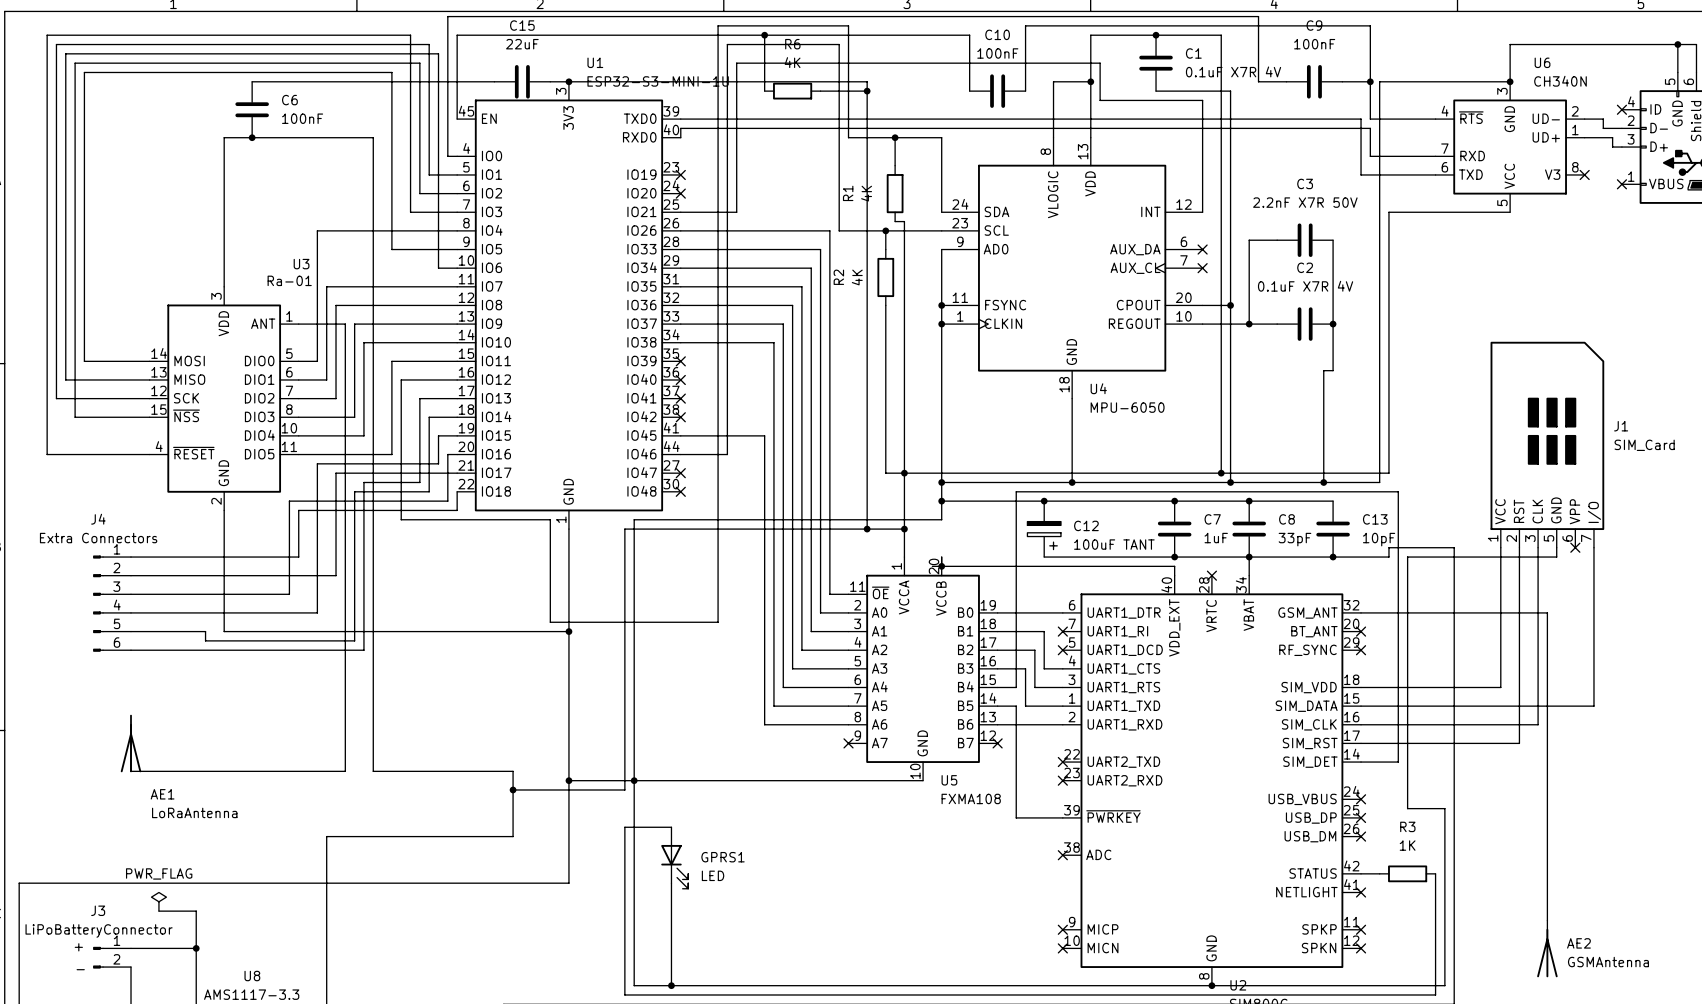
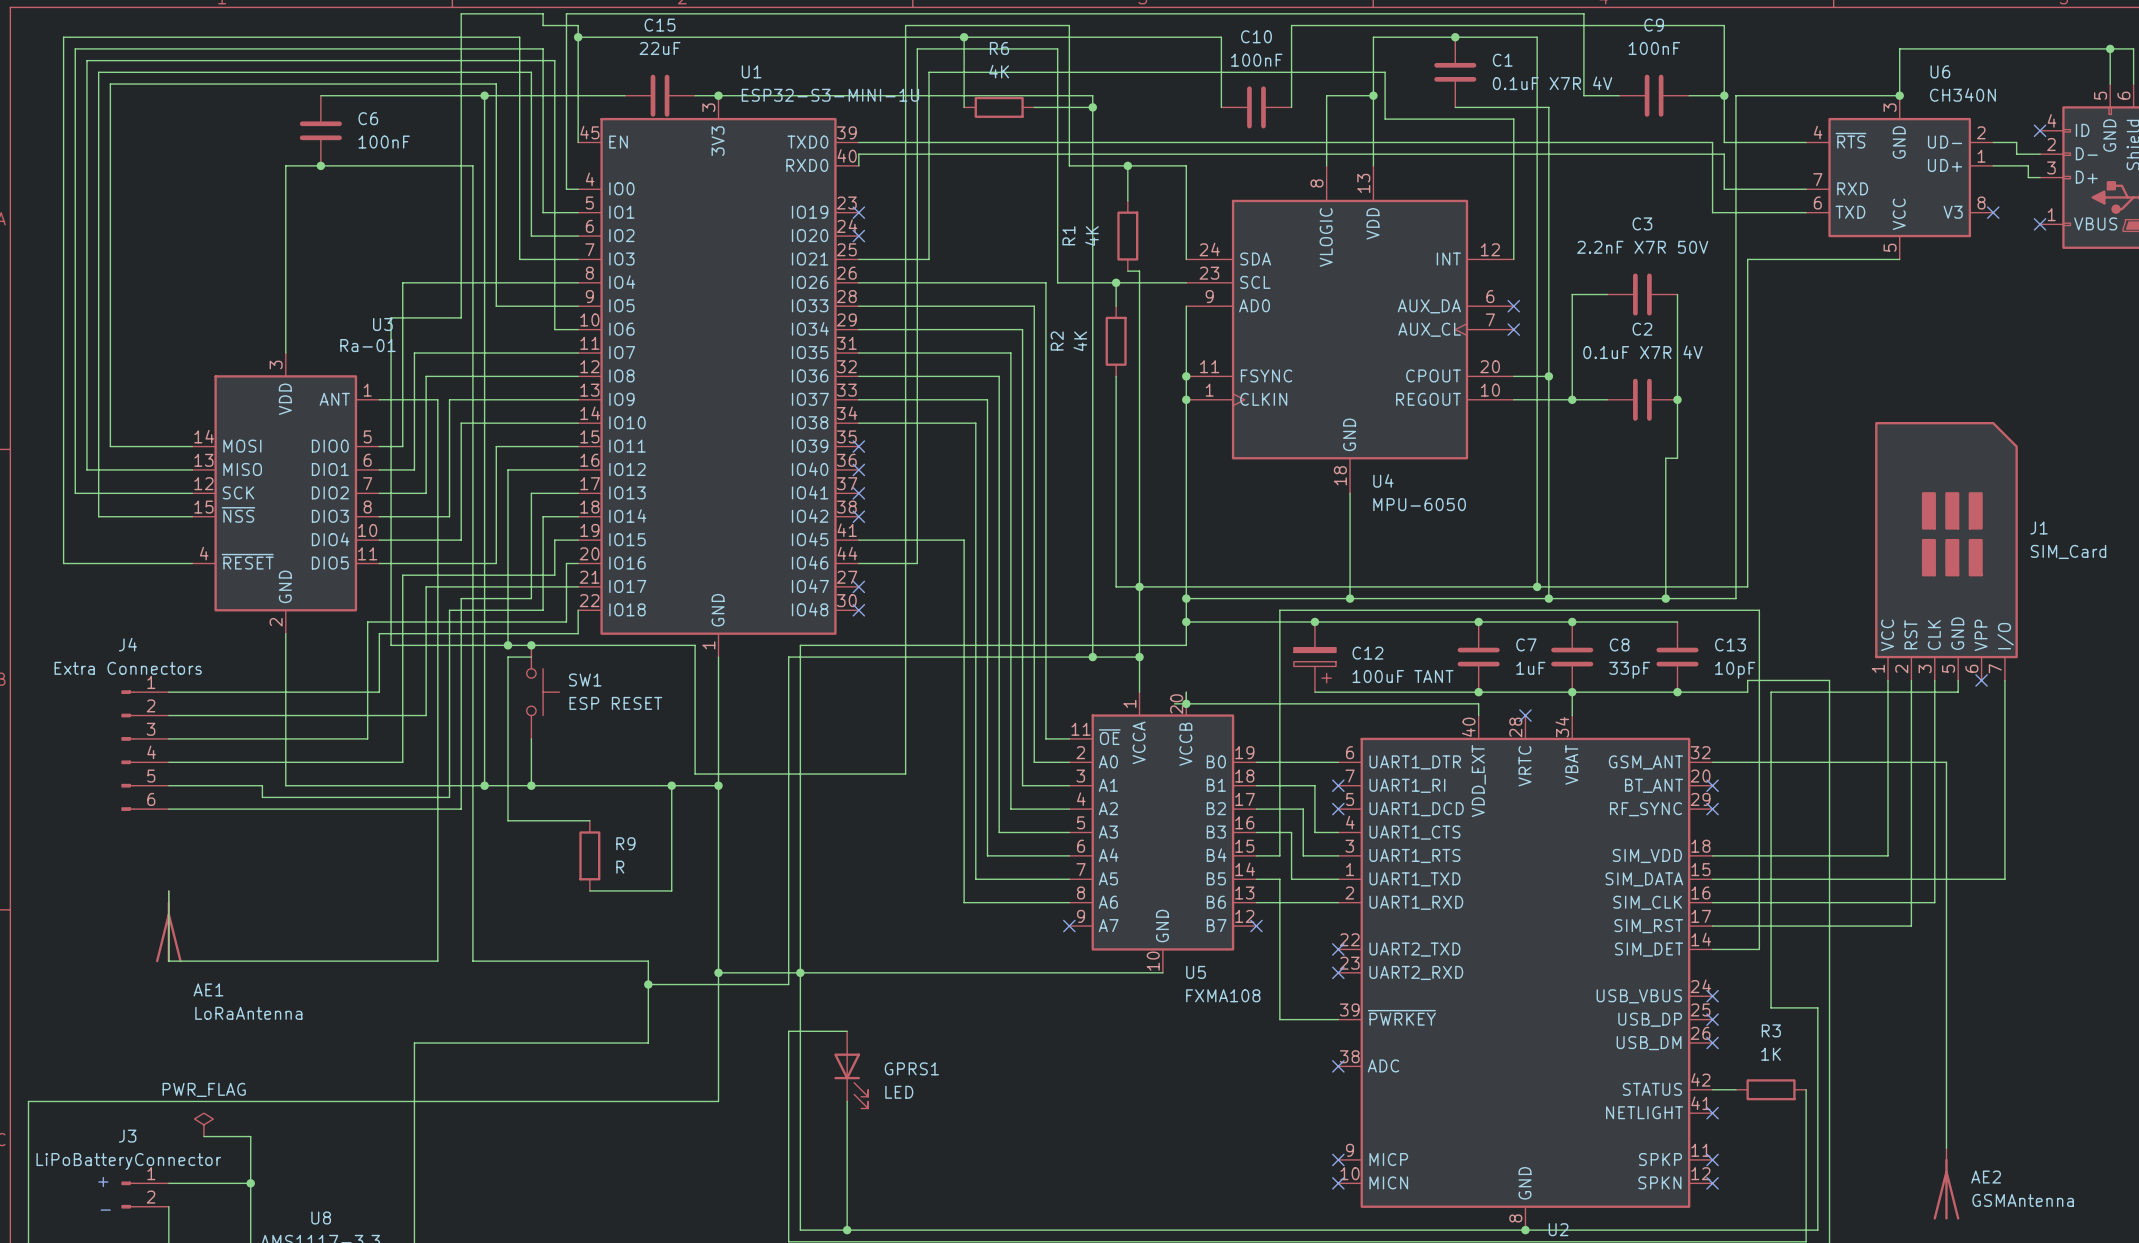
wire: none -> (578, 37) (578, 25) (543, 25) (543, 13) (461, 13) (461, 317) (391, 317) (391, 645) (507, 645)
junction: none -> (578, 37)
wire: none -> (484, 95) (484, 785)
junction: none -> (484, 95)
junction: none -> (507, 645)
junction: none -> (531, 645)
wire: none -> (531, 657) (507, 657) (507, 820) (589, 820)
SW1: none -> ESP RESET (543, 692)
wire: none -> (531, 738) (531, 785)
junction: none -> (484, 785)
junction: none -> (531, 785)
wire: none -> (671, 785) (671, 890) (589, 890)
junction: none -> (671, 785)
R9: none -> R (589, 855)

